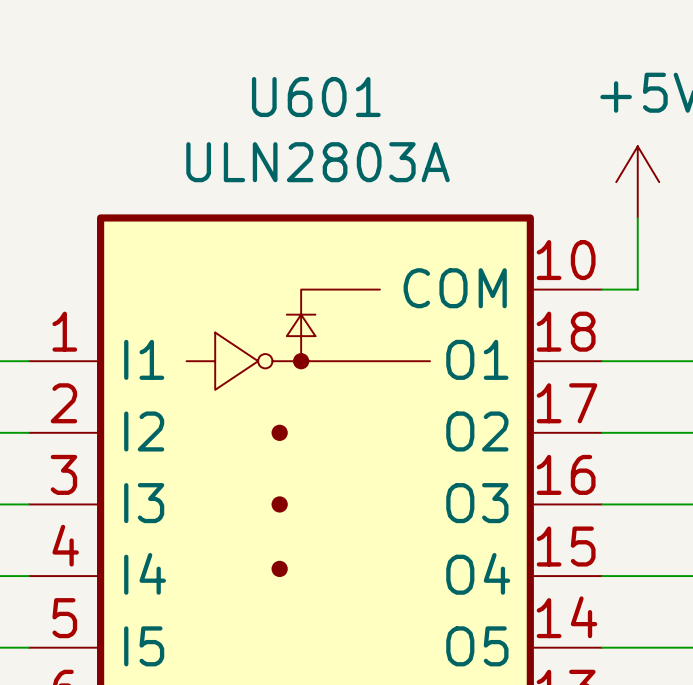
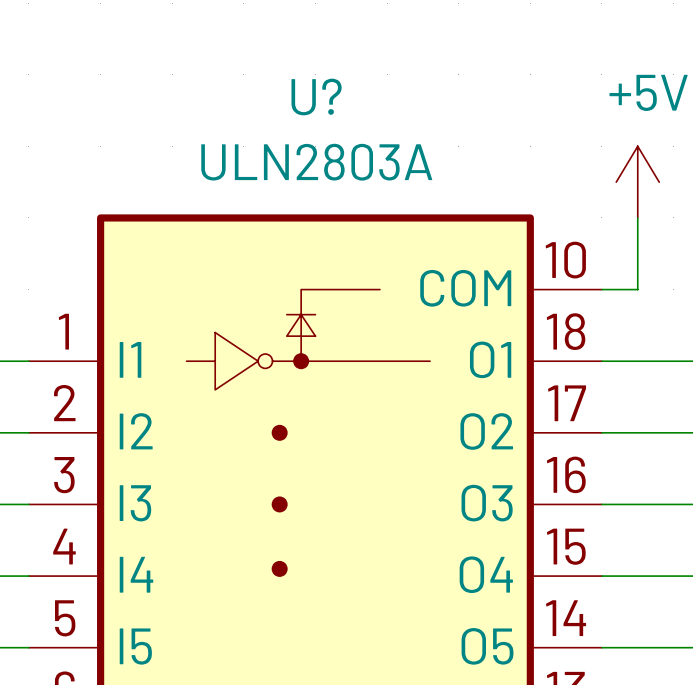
U601 name: U601 (316, 97) -> U? (316, 96)

